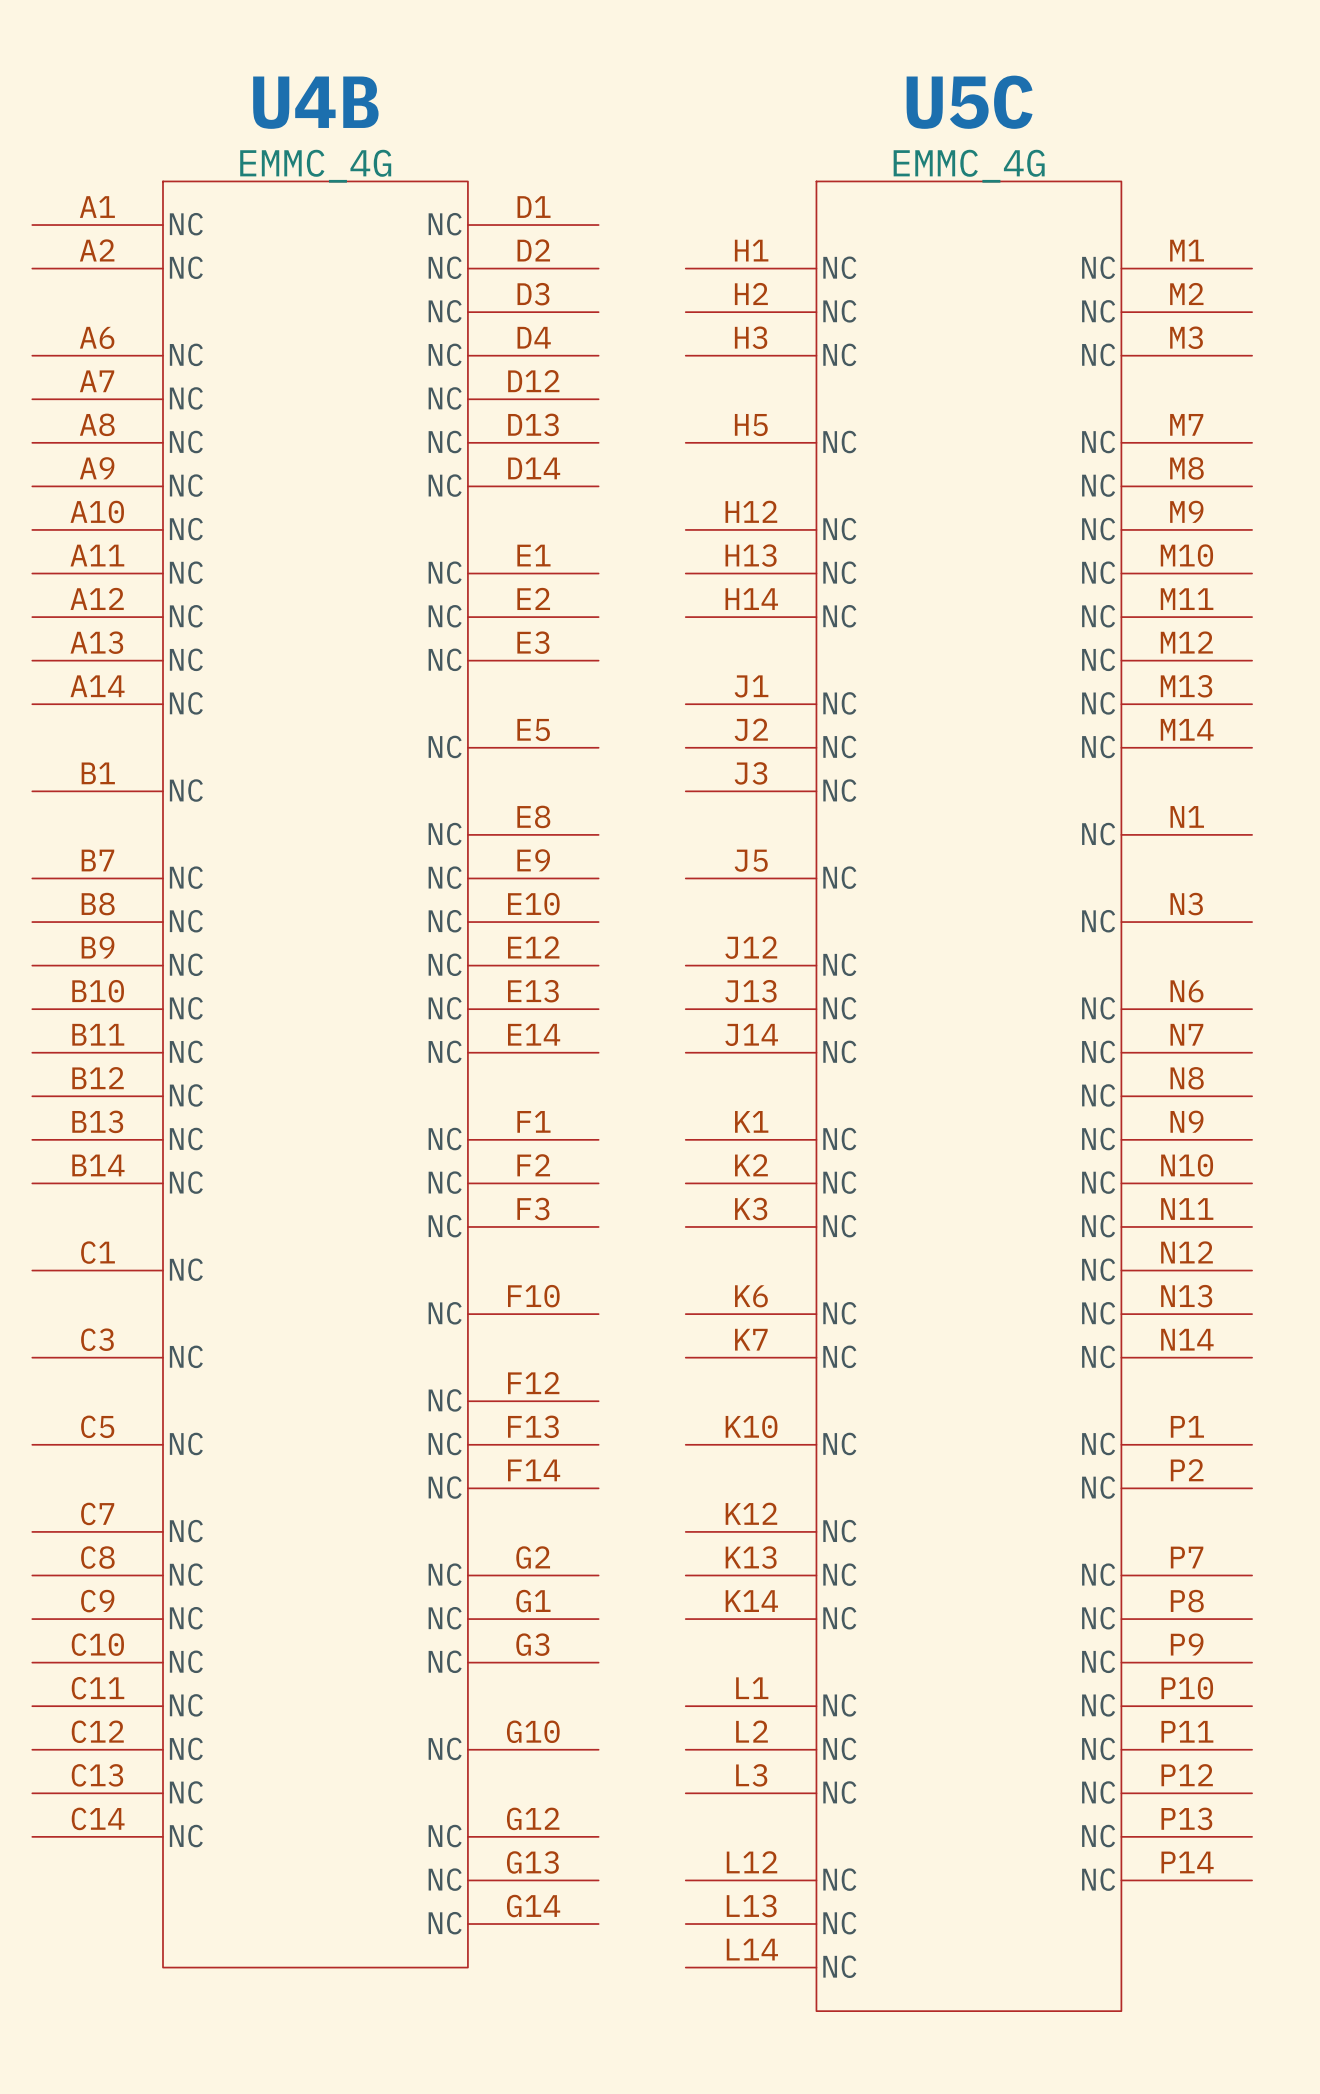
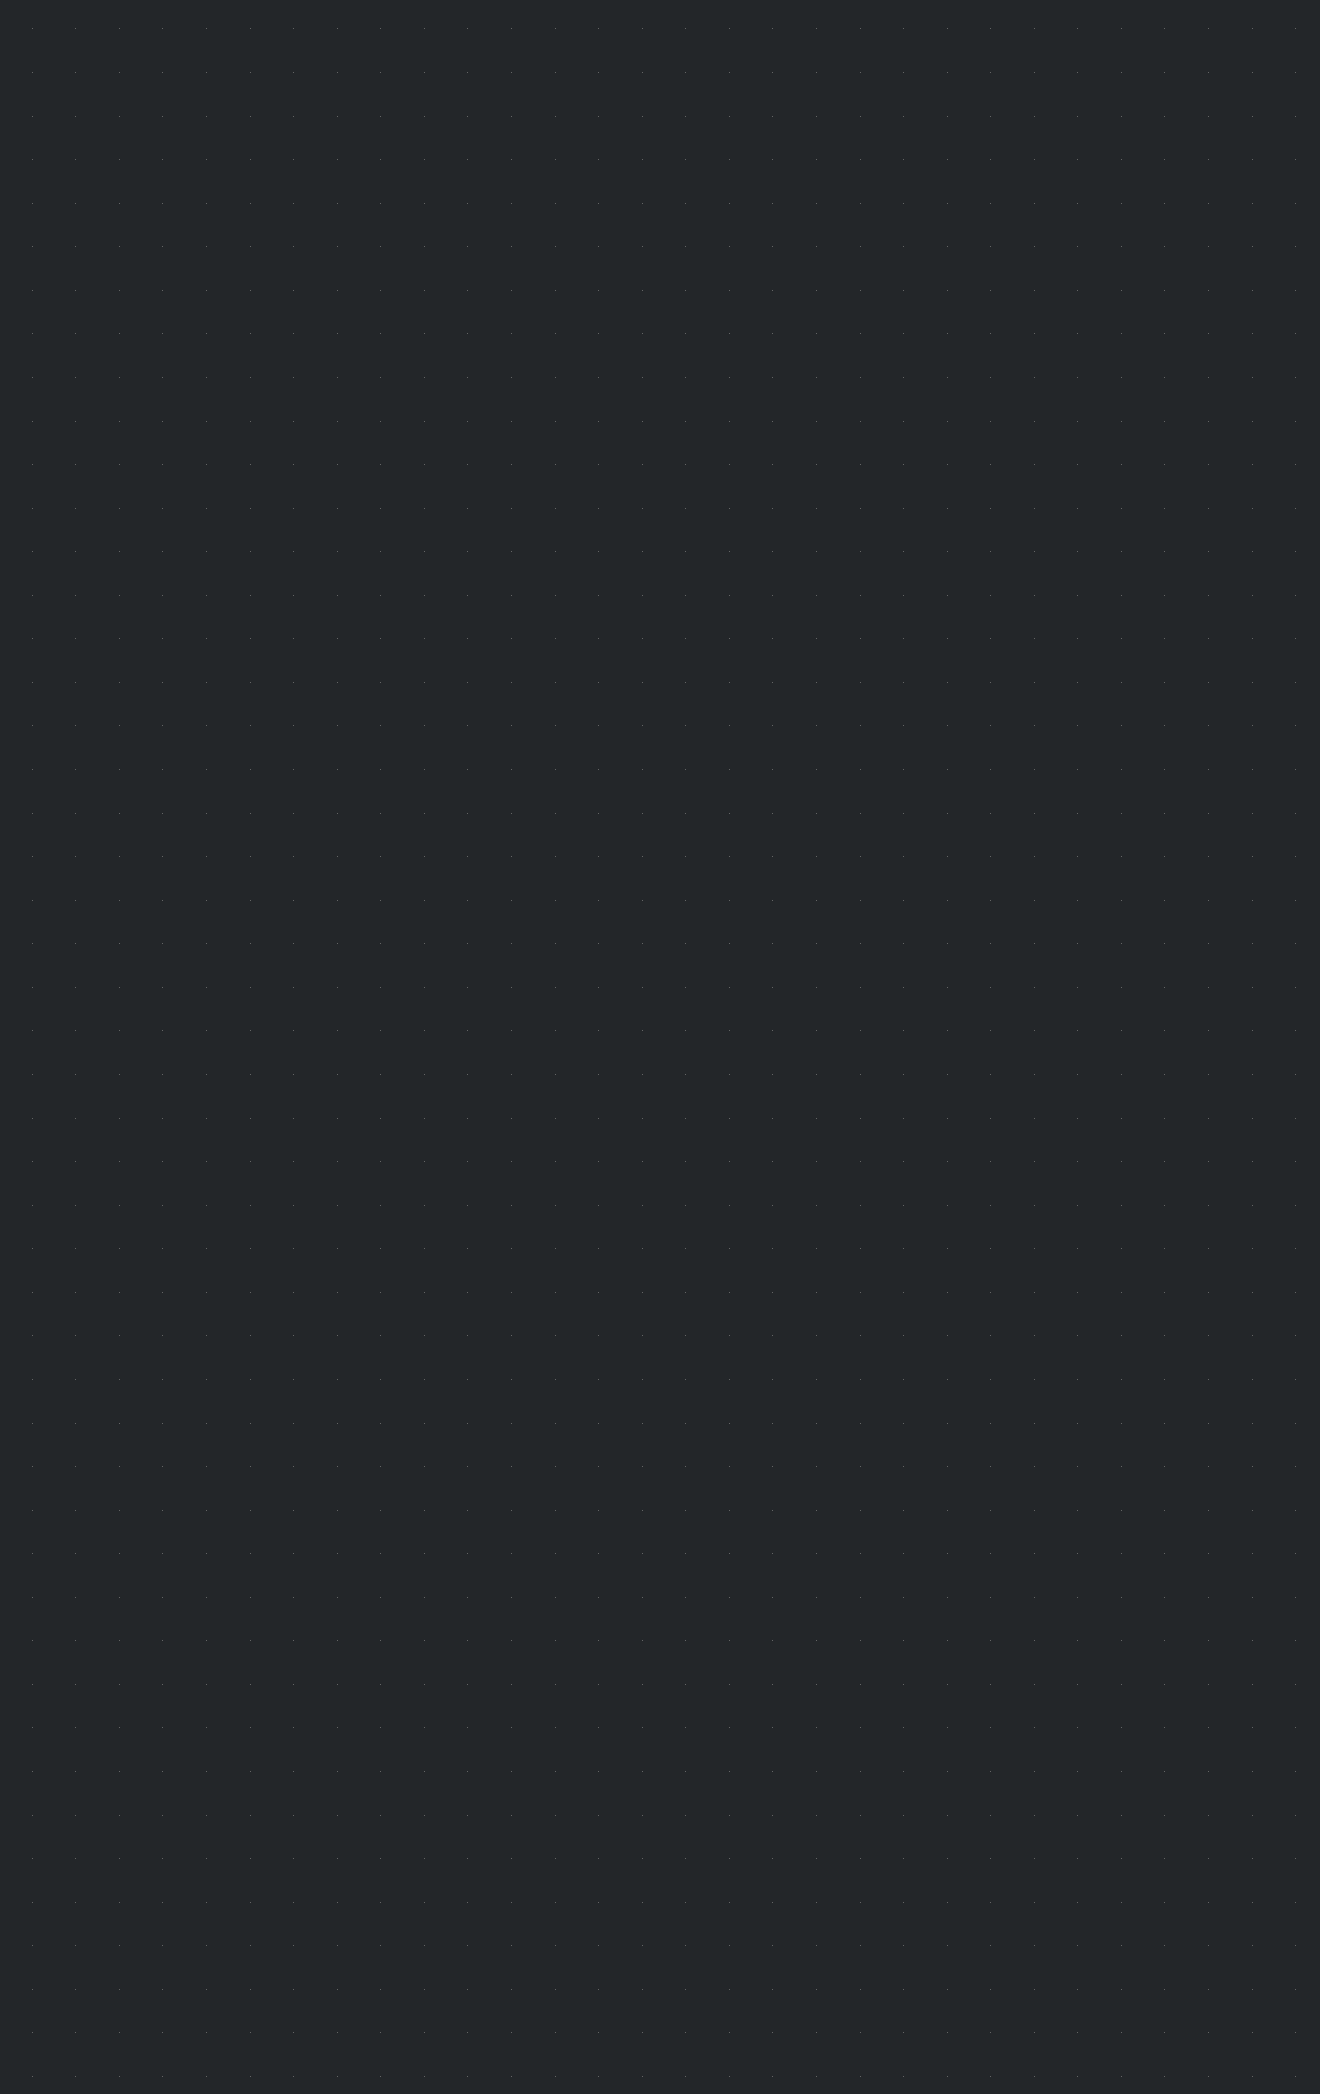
U4B: EMMC_4G (315, 1074) -> none
U5C: EMMC_4G (968, 1096) -> none

